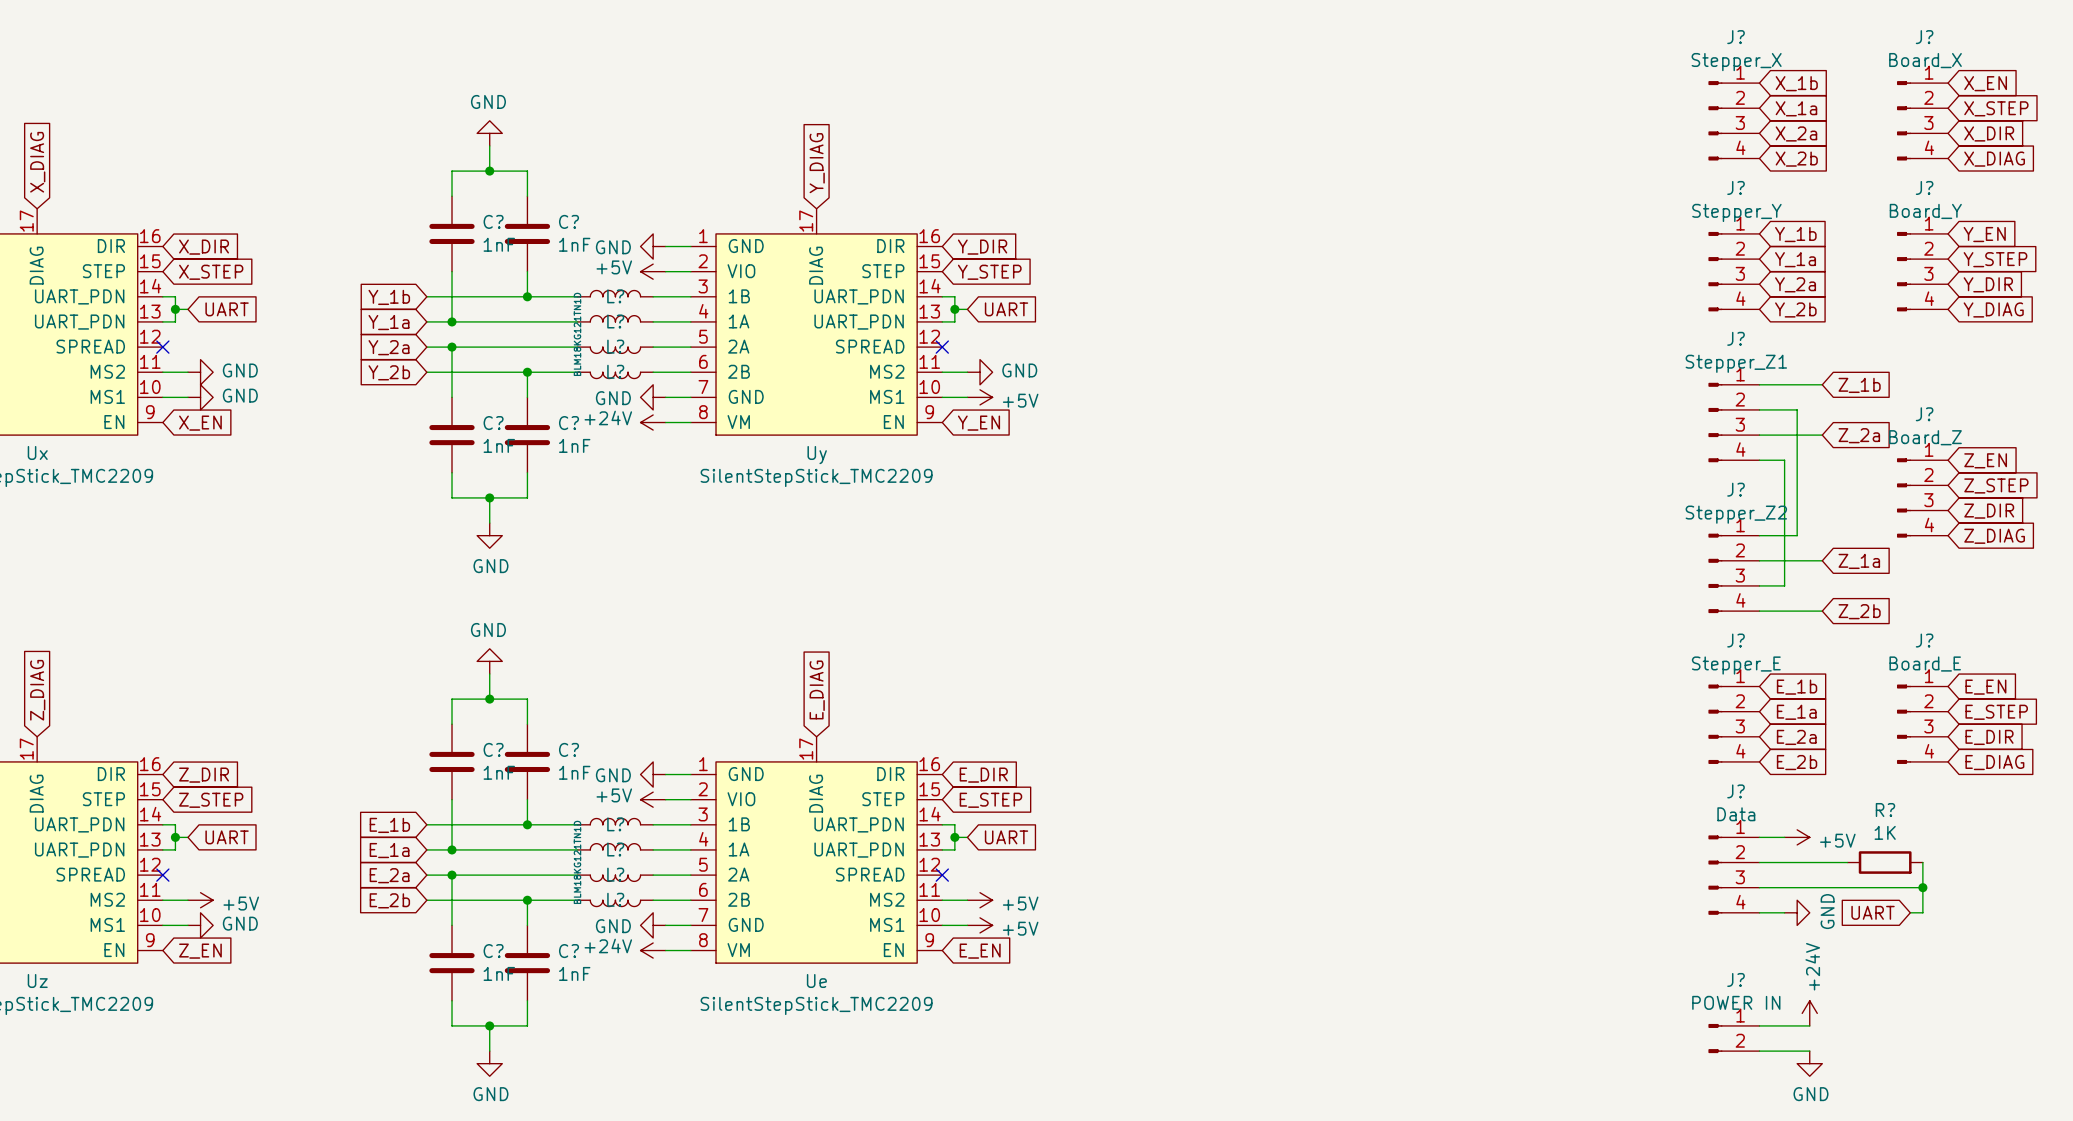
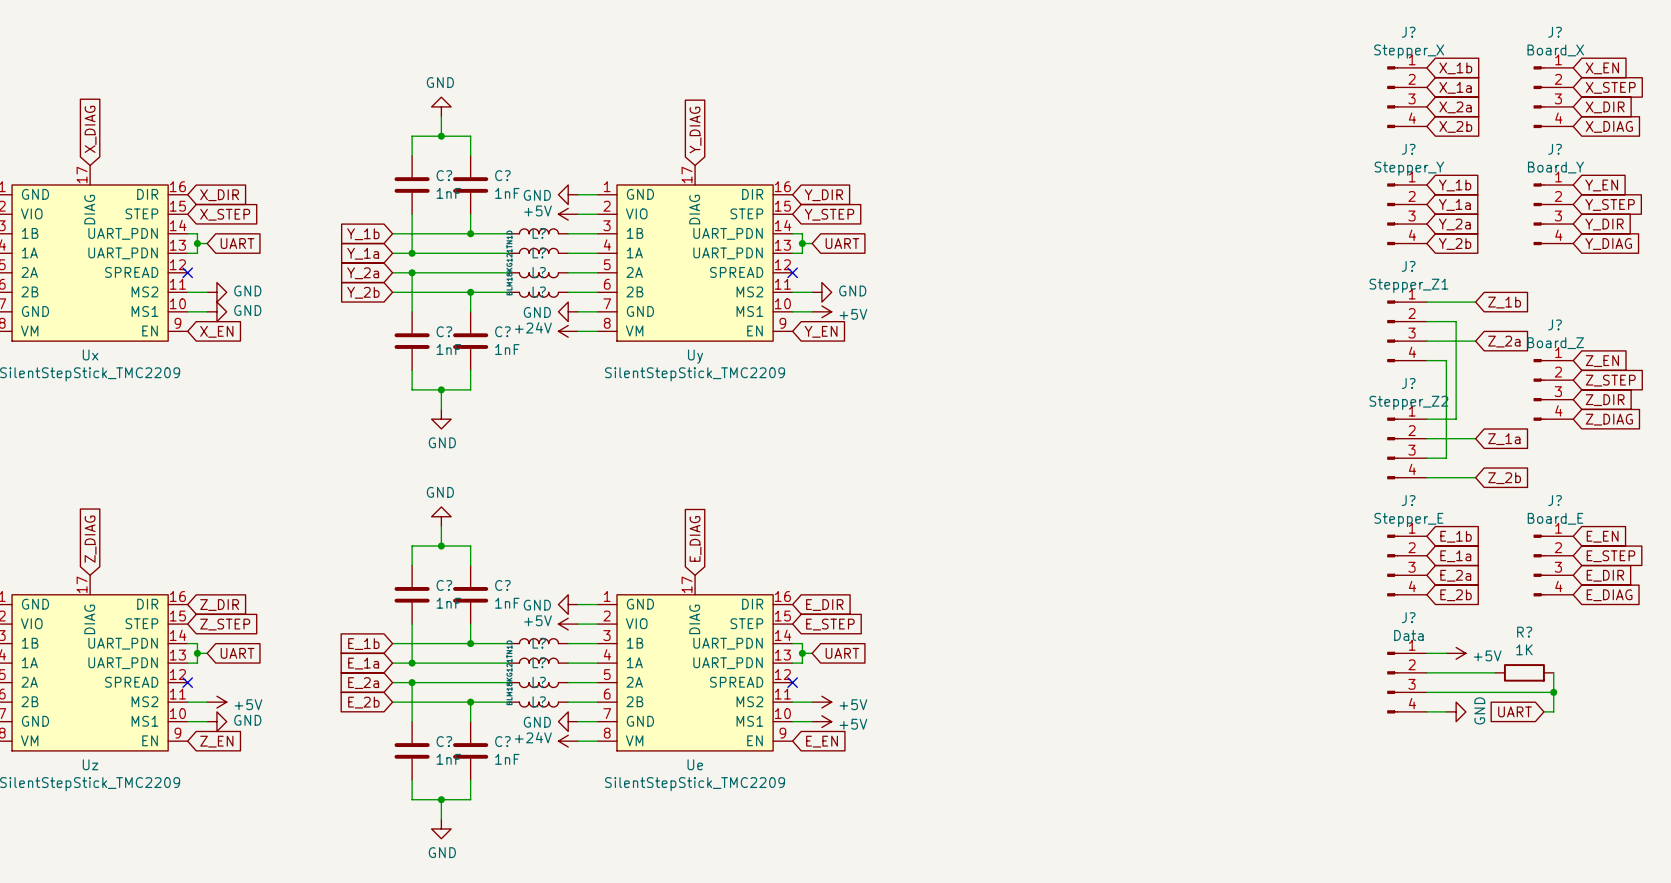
power symbol: +24V (1809, 1013) -> none
wire: (1759, 1025) (1809, 1025) -> none
J?: POWER IN (1733, 1038) -> none
wire: (1759, 1051) (1809, 1051) -> none
power symbol: GND (1809, 1063) -> none

